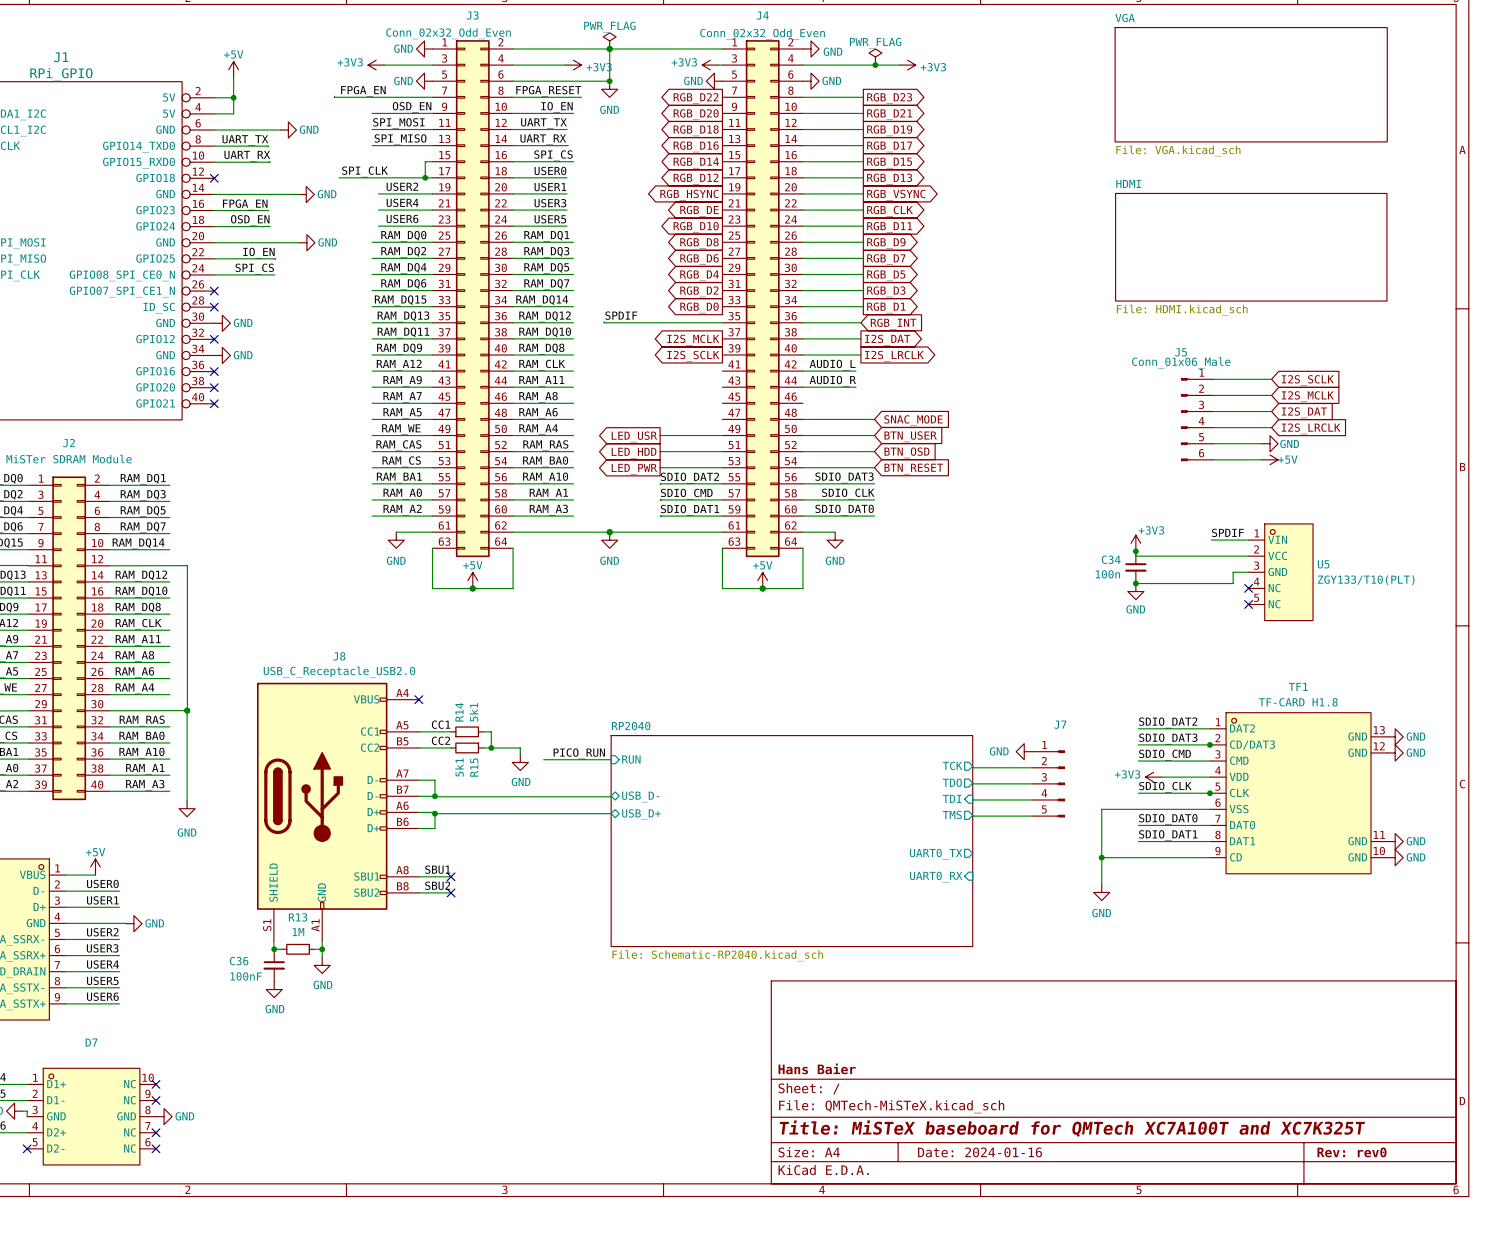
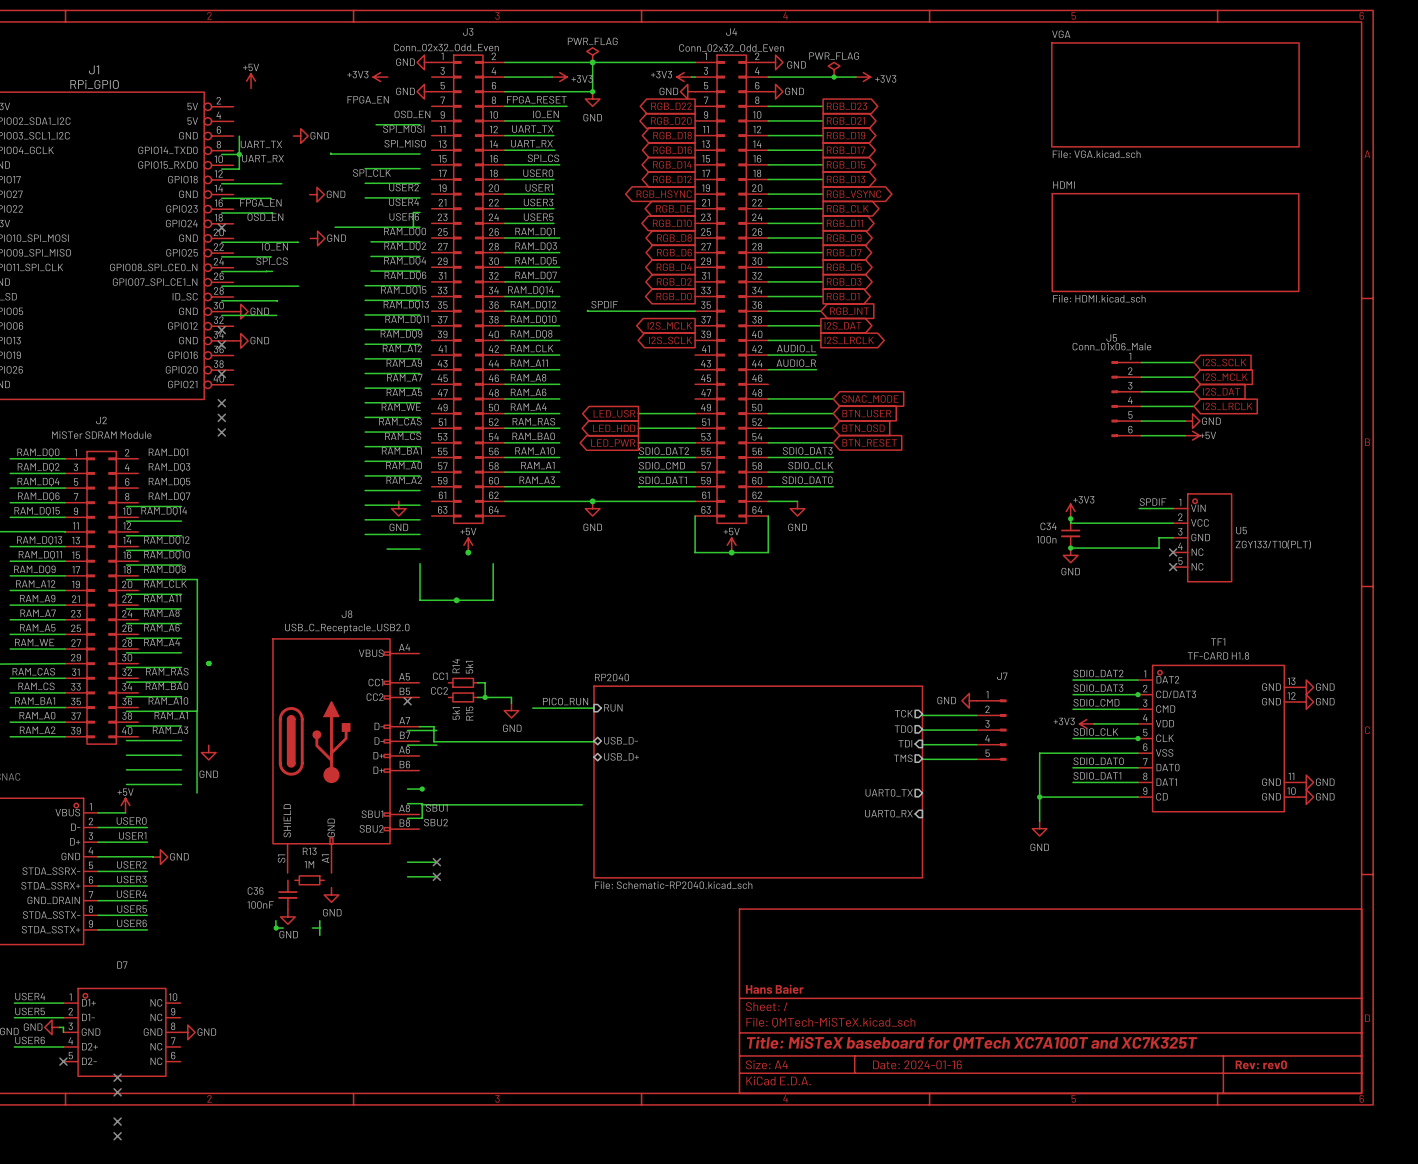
wire: (384, 65) (432, 65) -> (376, 124) (420, 124)
wire: (233, 77) (233, 113) (214, 113) -> (239, 136) (239, 169) (221, 169)
wire: (334, 96) (432, 97) -> (330, 153) (420, 154)
wire: (214, 97) (233, 97) -> (221, 154) (239, 154)
junction: (233, 97) -> none
wire: (372, 113) (432, 113) -> (365, 168) (420, 168)
wire: (372, 129) (432, 129) -> (365, 183) (420, 183)
wire: (214, 130) (280, 130) -> (221, 183) (281, 183)
wire: (372, 145) (432, 145) -> (365, 197) (420, 197)
wire: (214, 146) (268, 146) -> (221, 198) (270, 198)
junction: none -> (239, 154)
wire: (432, 161) (425, 161) (425, 177) -> (420, 212) (413, 212) (413, 227)
wire: (270, 162) (214, 162) -> (272, 212) (221, 212)
wire: (339, 177) (432, 177) -> (335, 227) (420, 227)
junction: (425, 177) -> none
no-connect mark: (214, 178) -> none
wire: (378, 193) (432, 193) -> (370, 241) (420, 241)
wire: (214, 194) (298, 194) -> (221, 242) (297, 242)
wire: (214, 210) (268, 210) -> (221, 256) (270, 257)
wire: (378, 210) (432, 210) -> (370, 256) (420, 256)
wire: (270, 226) (214, 226) -> (272, 271) (221, 271)
wire: (378, 226) (432, 226) -> (370, 271) (420, 271)
no-connect mark: none -> (221, 227)
wire: (214, 242) (298, 242) -> (221, 286) (298, 286)
wire: (372, 242) (432, 242) -> (365, 285) (420, 285)
wire: (214, 258) (275, 259) -> (221, 300) (277, 301)
wire: (372, 258) (432, 258) -> (365, 300) (420, 300)
wire: (214, 274) (274, 274) -> (221, 315) (276, 315)
wire: (372, 274) (432, 274) -> (365, 314) (420, 314)
wire: (372, 290) (432, 290) -> (365, 329) (420, 329)
no-connect mark: (214, 291) -> none
wire: (372, 306) (432, 306) -> (365, 344) (420, 344)
no-connect mark: (214, 307) -> none
wire: (372, 322) (432, 322) -> (365, 358) (420, 358)
wire: (372, 338) (432, 338) -> (365, 373) (420, 373)
no-connect mark: (214, 339) -> none
no-connect mark: none -> (221, 330)
wire: (372, 354) (432, 354) -> (365, 388) (420, 388)
no-connect mark: none -> (221, 344)
no-connect mark: (214, 371) -> none
wire: (372, 371) (432, 371) -> (365, 402) (420, 402)
no-connect mark: (214, 387) -> none
wire: (372, 387) (432, 387) -> (365, 417) (420, 417)
no-connect mark: none -> (221, 373)
no-connect mark: (214, 403) -> none
wire: (372, 403) (432, 403) -> (365, 432) (420, 432)
wire: (372, 419) (432, 419) -> (365, 446) (420, 446)
no-connect mark: none -> (221, 403)
wire: (372, 435) (432, 435) -> (365, 461) (420, 461)
no-connect mark: none -> (221, 417)
wire: (372, 451) (432, 451) -> (365, 475) (420, 475)
no-connect mark: none -> (221, 432)
wire: (372, 467) (432, 467) -> (365, 490) (420, 490)
wire: (372, 483) (432, 483) -> (365, 505) (420, 505)
wire: (109, 485) (169, 485) -> (126, 506) (181, 506)
wire: (372, 499) (432, 499) -> (365, 519) (420, 519)
wire: (109, 501) (169, 501) -> (126, 521) (181, 521)
wire: (372, 516) (432, 516) -> (365, 534) (420, 534)
wire: (109, 517) (169, 517) -> (126, 535) (181, 535)
wire: (396, 532) (432, 532) -> (387, 549) (420, 549)
wire: (109, 533) (169, 533) -> (126, 550) (181, 550)
wire: (432, 548) (432, 588) (513, 588) (513, 548) -> (420, 563) (420, 600) (493, 600) (493, 563)
wire: (109, 549) (169, 549) -> (126, 565) (181, 565)
wire: (109, 565) (187, 565) (187, 710) -> (126, 579) (197, 579) (197, 711)
wire: (109, 581) (169, 581) -> (126, 594) (181, 594)
wire: (109, 598) (169, 598) -> (126, 608) (181, 608)
wire: (109, 614) (169, 614) -> (126, 623) (181, 623)
wire: (109, 630) (169, 630) -> (126, 638) (181, 638)
junction: none -> (456, 600)
wire: (109, 646) (169, 646) -> (126, 652) (181, 652)
wire: (109, 662) (169, 662) -> (126, 667) (181, 667)
wire: (109, 678) (169, 678) -> (126, 682) (181, 682)
wire: (109, 694) (169, 694) -> (126, 696) (181, 696)
no-connect mark: (418, 699) -> none
wire: (187, 710) (109, 710) -> (197, 711) (126, 711)
wire: (187, 710) (187, 800) -> (197, 711) (197, 792)
wire: (109, 726) (169, 726) -> (126, 725) (181, 725)
wire: (418, 731) (451, 731) -> (407, 730) (436, 730)
wire: (109, 742) (169, 742) -> (126, 740) (181, 740)
wire: (418, 747) (451, 747) -> (407, 745) (436, 745)
no-connect mark: none -> (407, 701)
wire: (109, 759) (169, 759) -> (126, 755) (181, 755)
wire: (109, 775) (169, 775) -> (126, 769) (181, 769)
wire: (109, 791) (169, 791) -> (126, 784) (181, 784)
wire: (418, 796) (434, 796) -> (407, 789) (422, 789)
junction: (434, 796) -> none
wire: (418, 812) (434, 812) (434, 828) (418, 828) -> (407, 803) (422, 803) (422, 818) (407, 818)
wire: (434, 813) (611, 813) -> (422, 804) (582, 804)
junction: (434, 813) -> none
junction: none -> (422, 789)
wire: (418, 876) (451, 876) -> (407, 862) (436, 862)
no-connect mark: (451, 876) -> none
wire: (418, 892) (451, 892) -> (407, 876) (436, 876)
no-connect mark: (451, 892) -> none
no-connect mark: none -> (436, 862)
wire: (273, 941) (273, 949) (281, 949) -> (275, 920) (275, 928) (283, 928)
wire: (322, 941) (322, 957) -> (319, 920) (319, 935)
no-connect mark: none -> (436, 876)
junction: (274, 949) -> none
wire: (314, 949) (322, 949) -> (312, 928) (319, 928)
junction: (322, 949) -> none
junction: none -> (276, 928)
no-connect mark: (155, 1084) -> none
no-connect mark: (155, 1100) -> none
no-connect mark: (155, 1132) -> none
no-connect mark: (155, 1148) -> none
no-connect mark: none -> (117, 1077)
no-connect mark: none -> (117, 1092)
no-connect mark: none -> (117, 1121)
no-connect mark: none -> (117, 1136)

